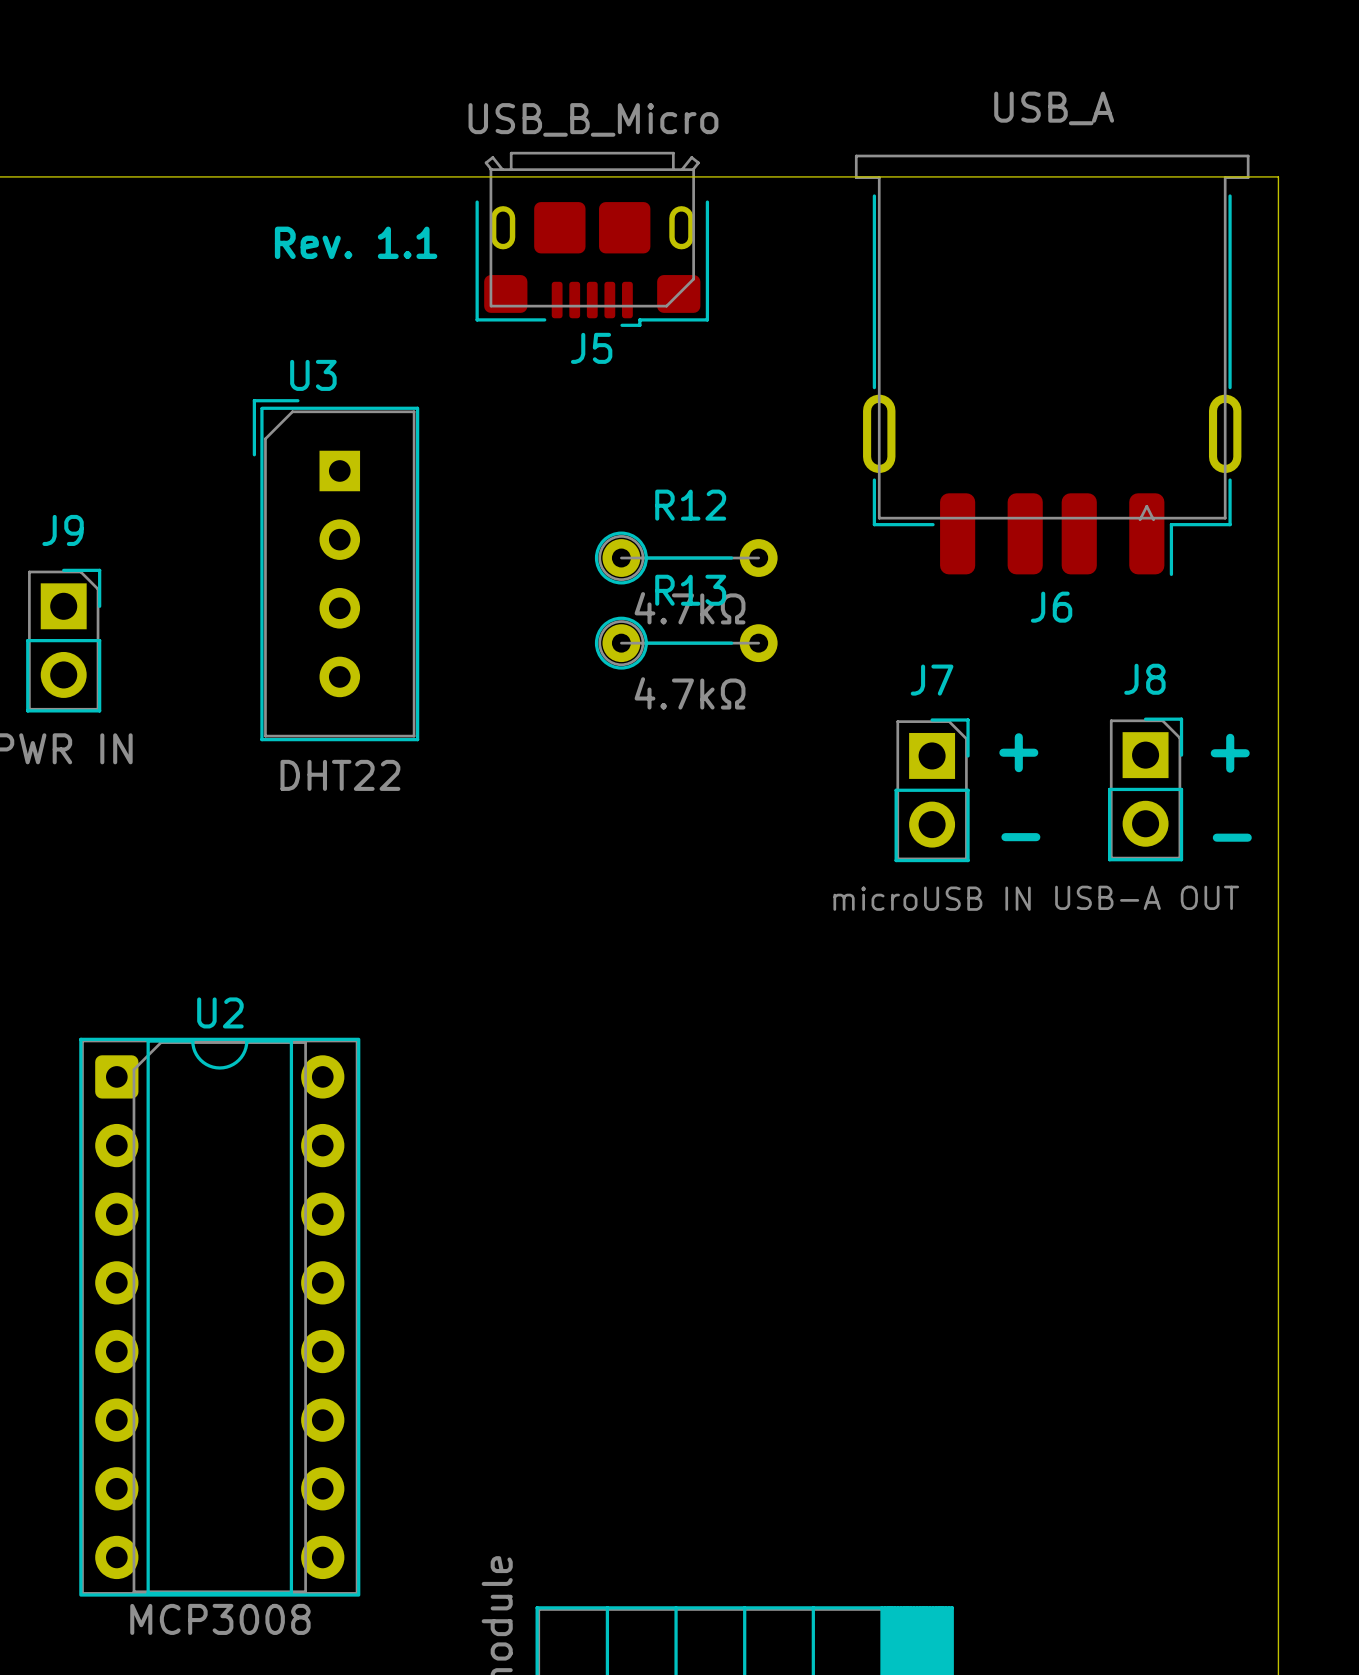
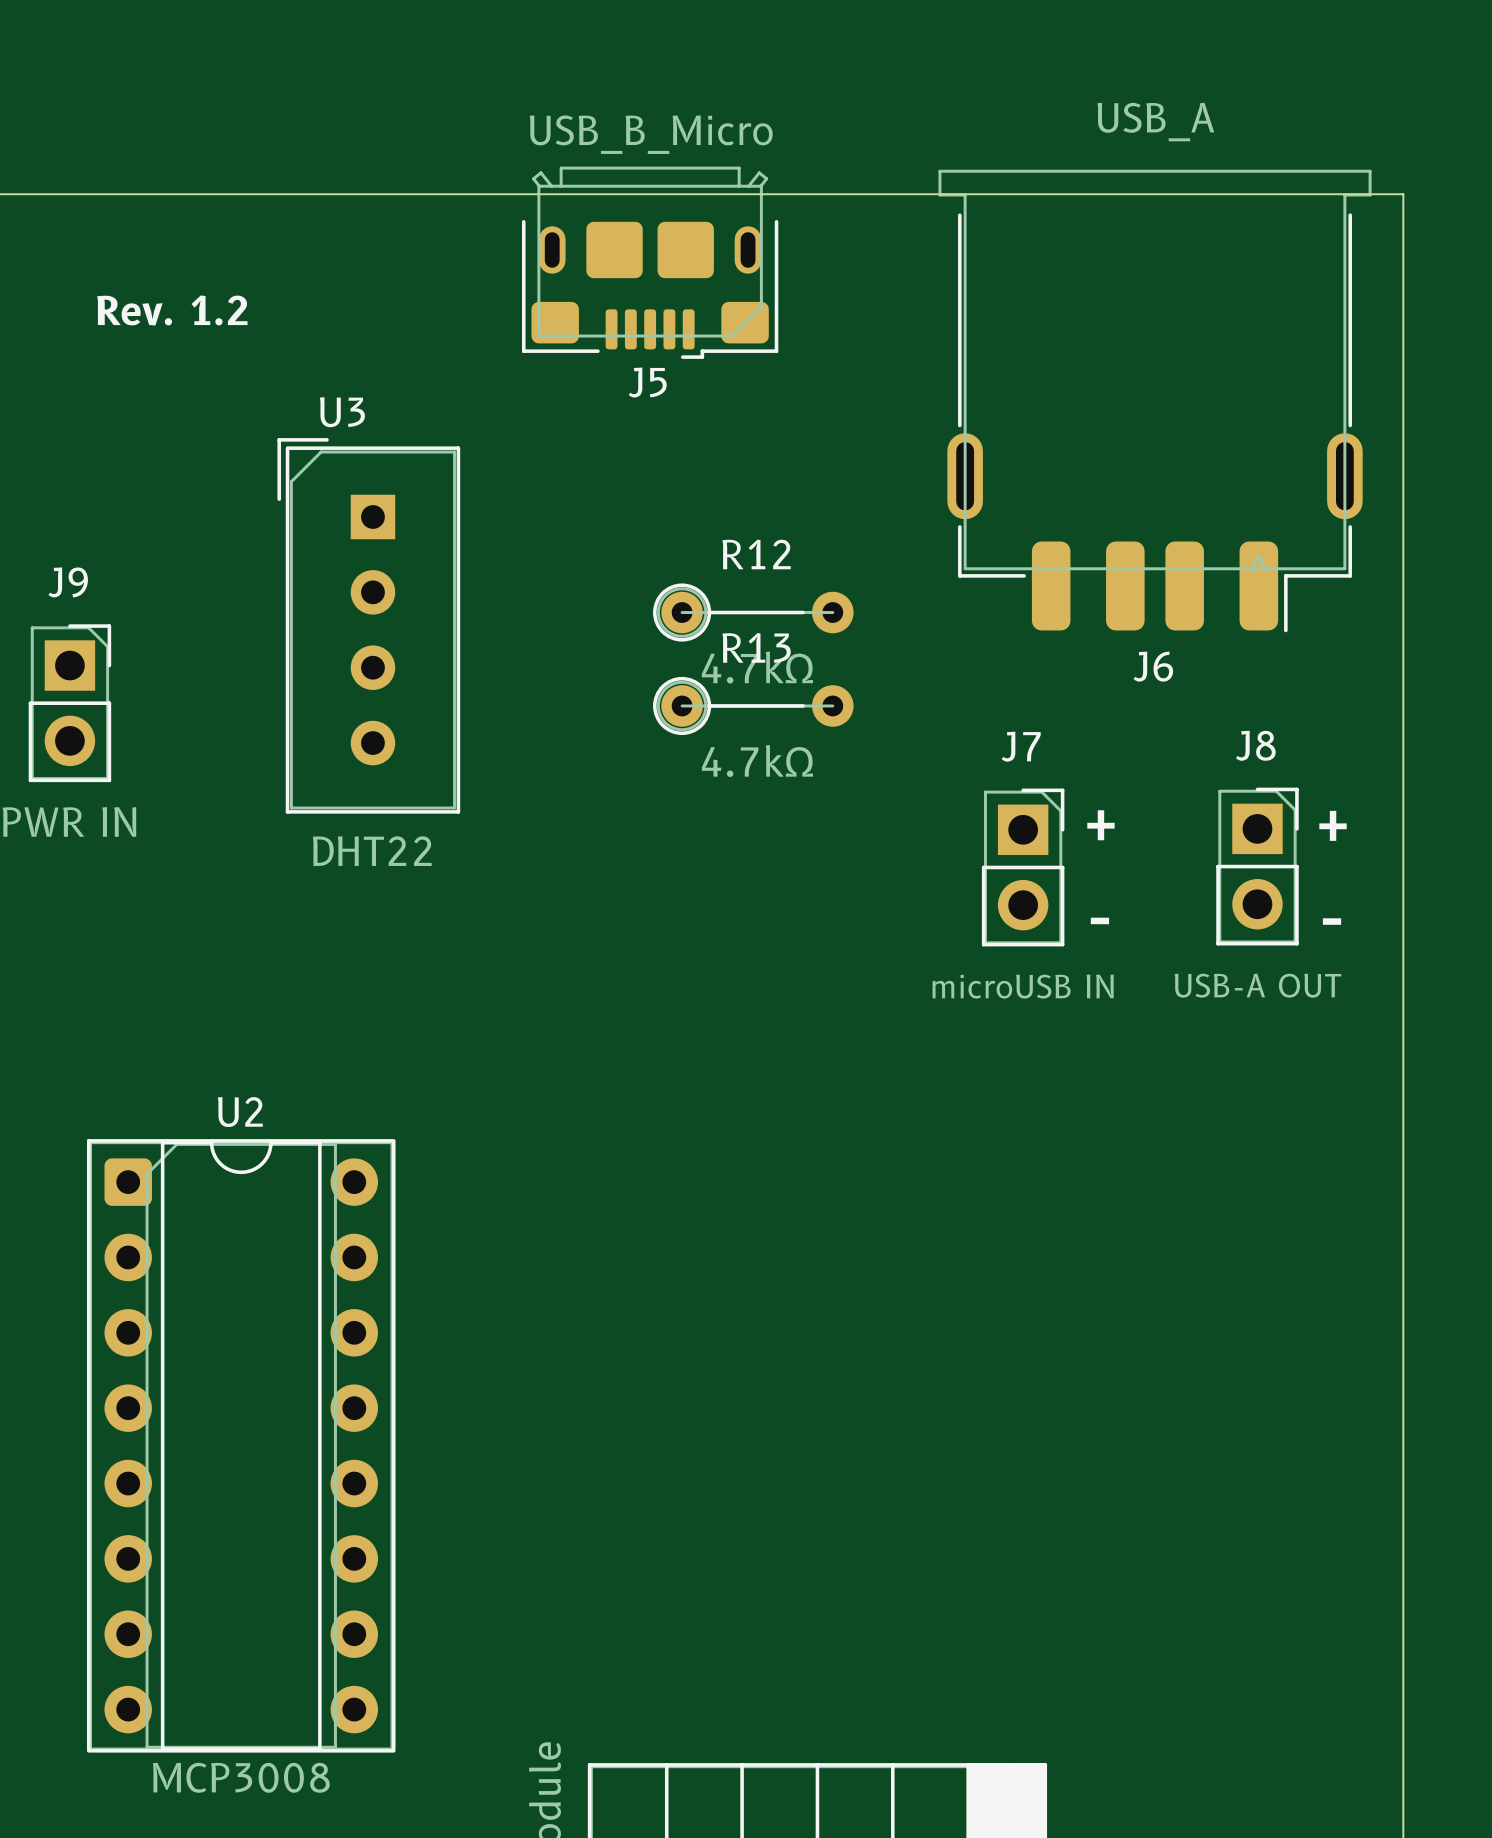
text: Rev. 1.1 (356, 242) -> Rev. 1.2 (172, 310)

